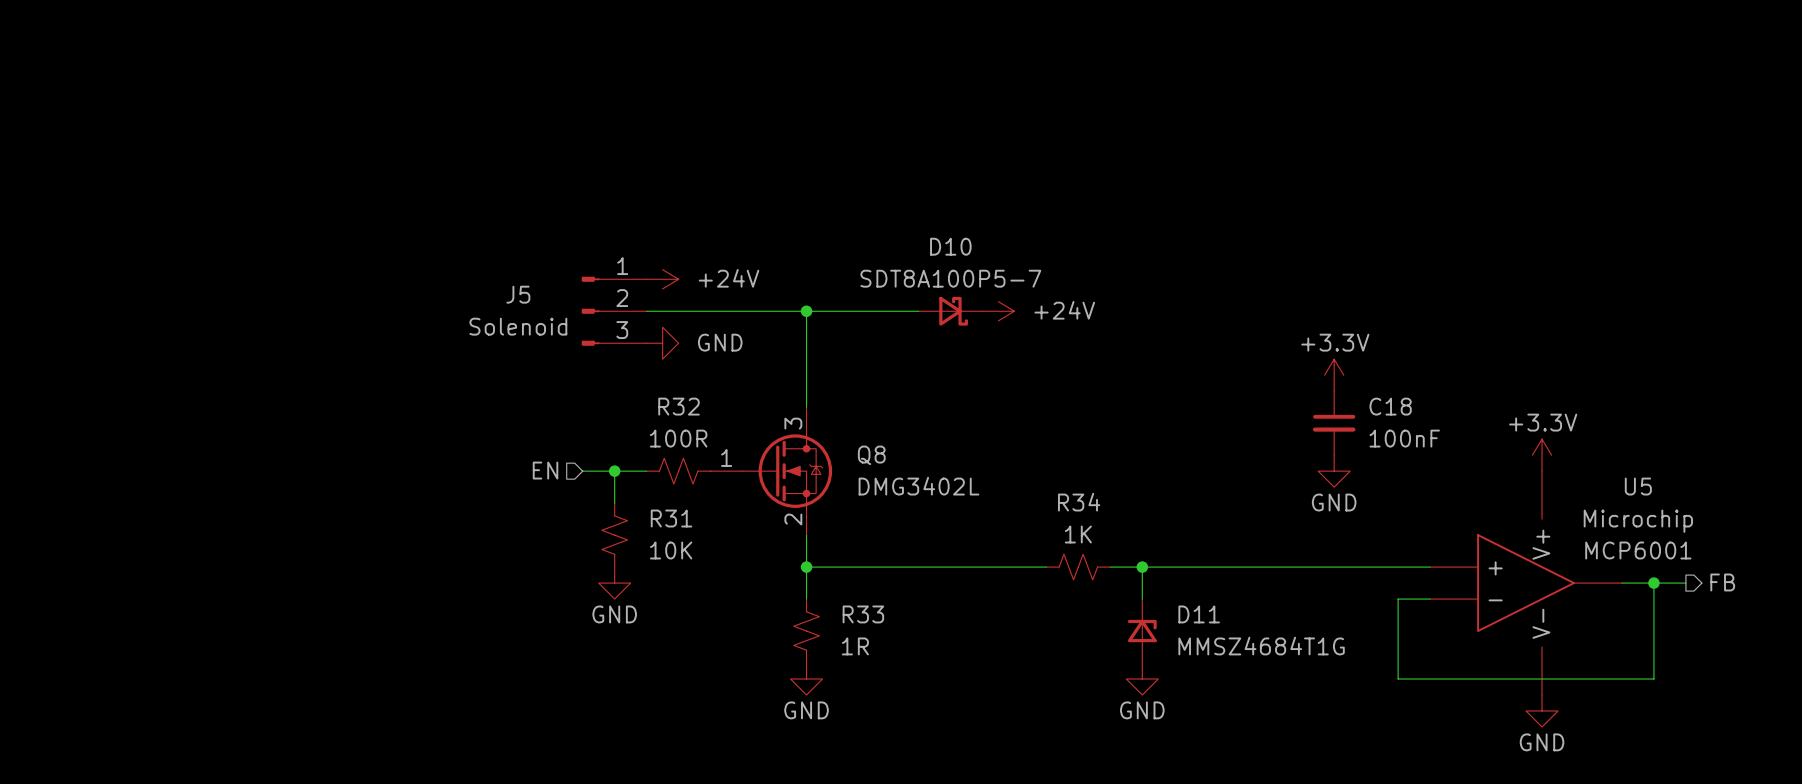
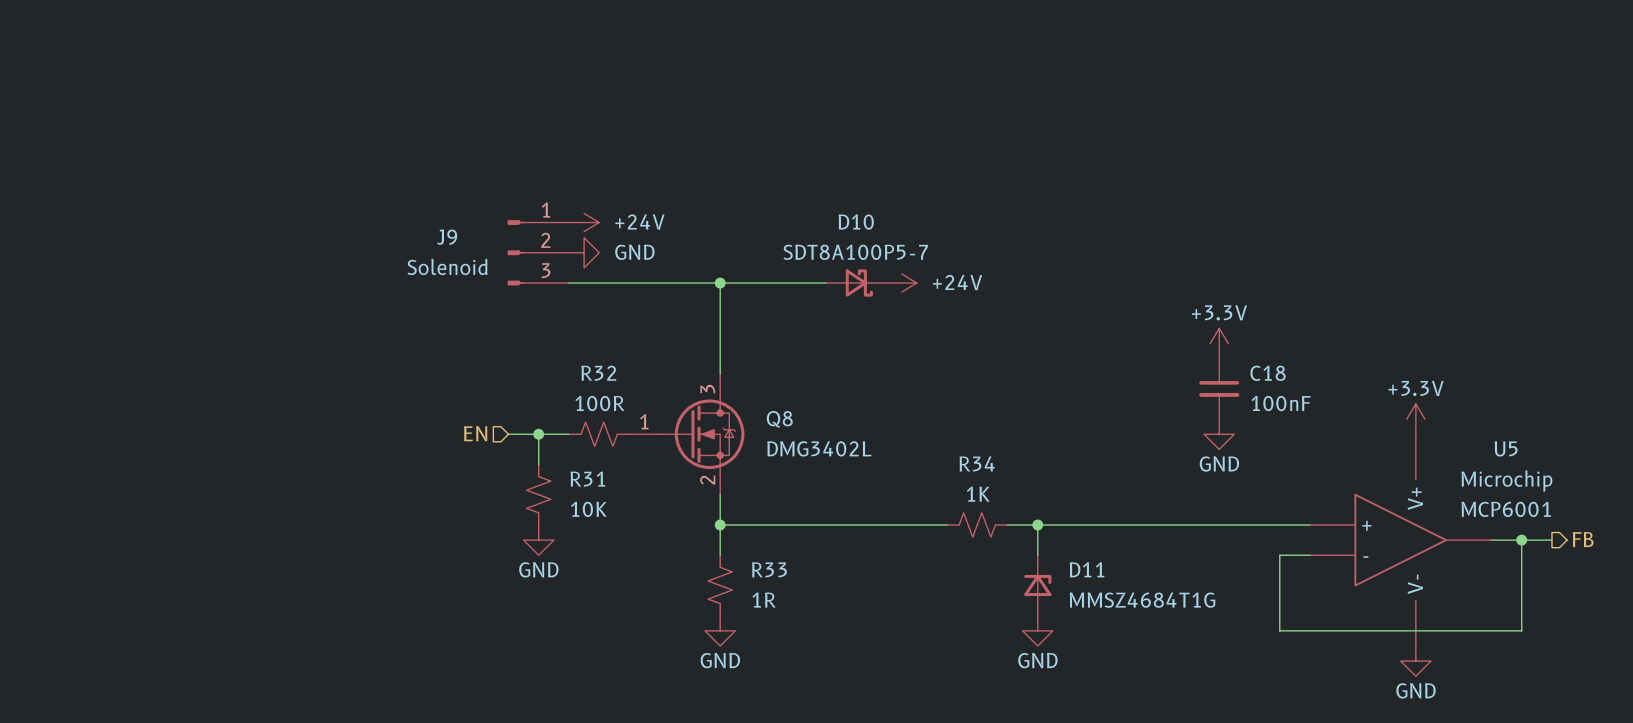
power symbol: none -> +24V (584, 222)
J9: none -> Solenoid (538, 252)
power symbol: +24V (662, 279) -> GND (584, 252)
J5: Solenoid (614, 311) -> none
power symbol: GND (662, 343) -> none

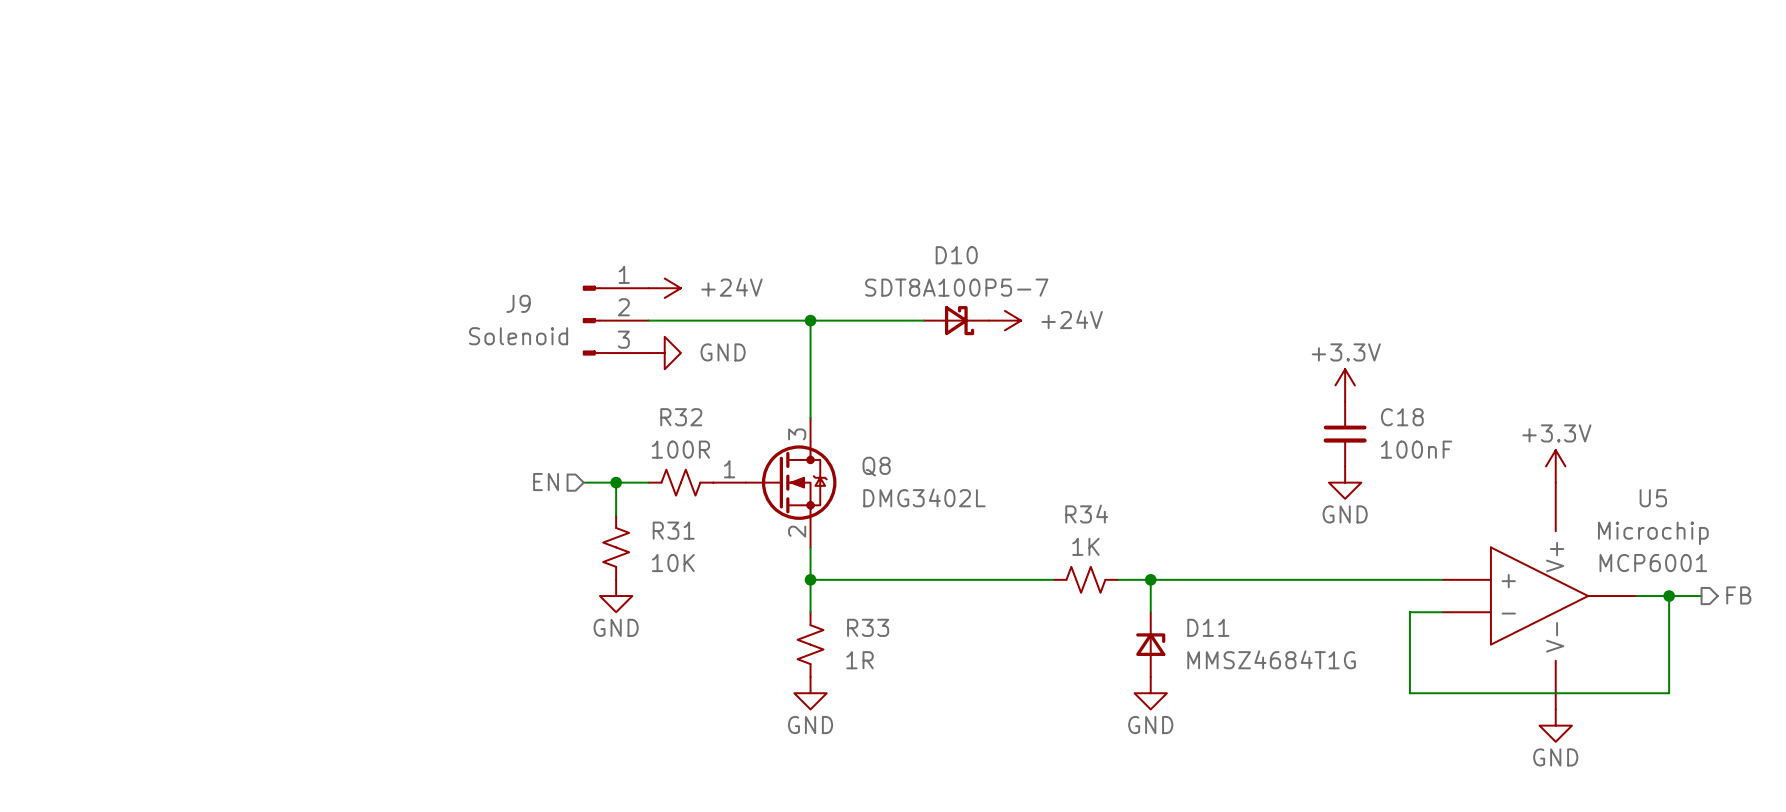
power symbol: +24V (584, 222) -> none
J9 position: (538, 252) -> (615, 320)
power symbol: GND (584, 252) -> +24V (664, 288)
power symbol: none -> GND (664, 353)

